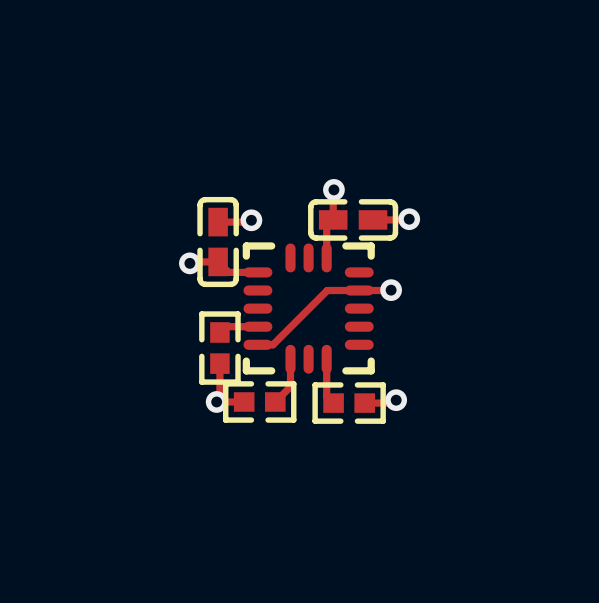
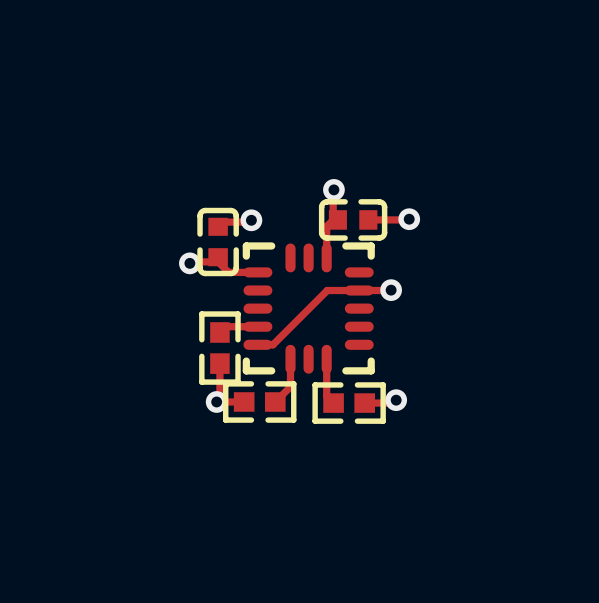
part footprint: [197, 196, 239, 288] -> [197, 207, 239, 277]
part footprint: [308, 199, 399, 241] -> [318, 199, 388, 241]

